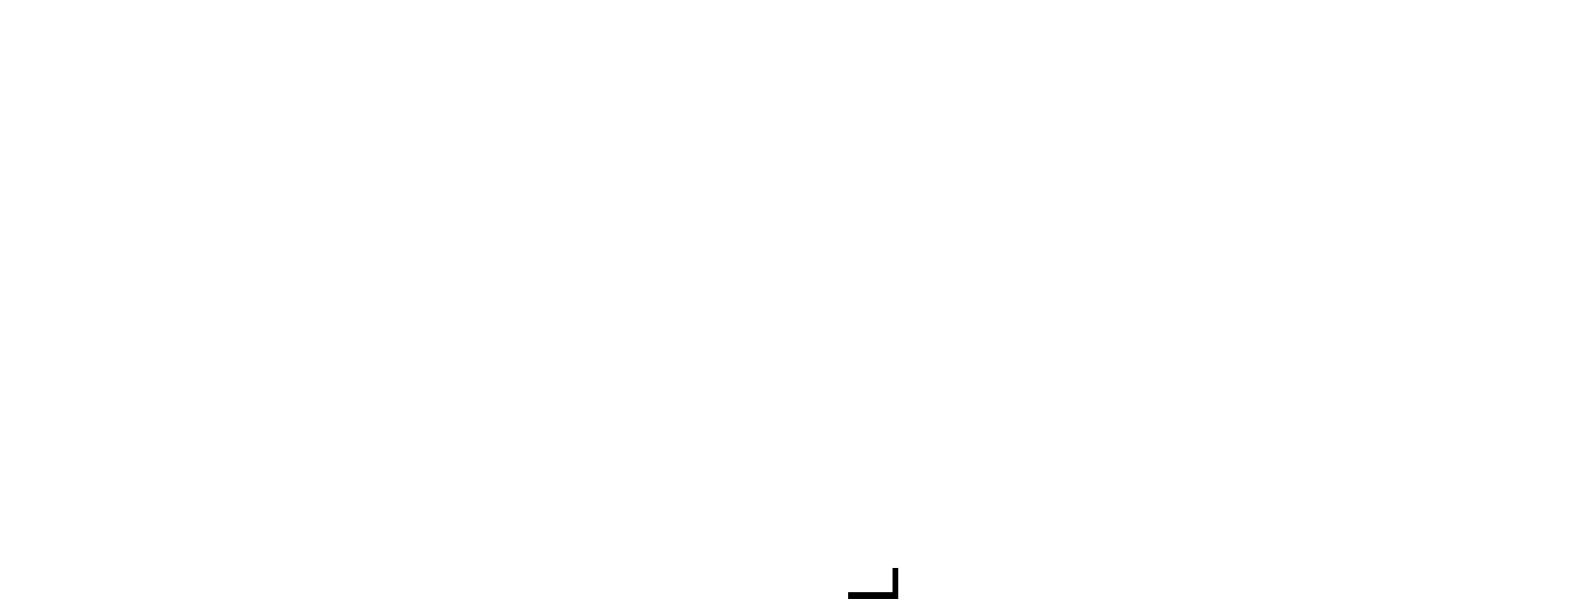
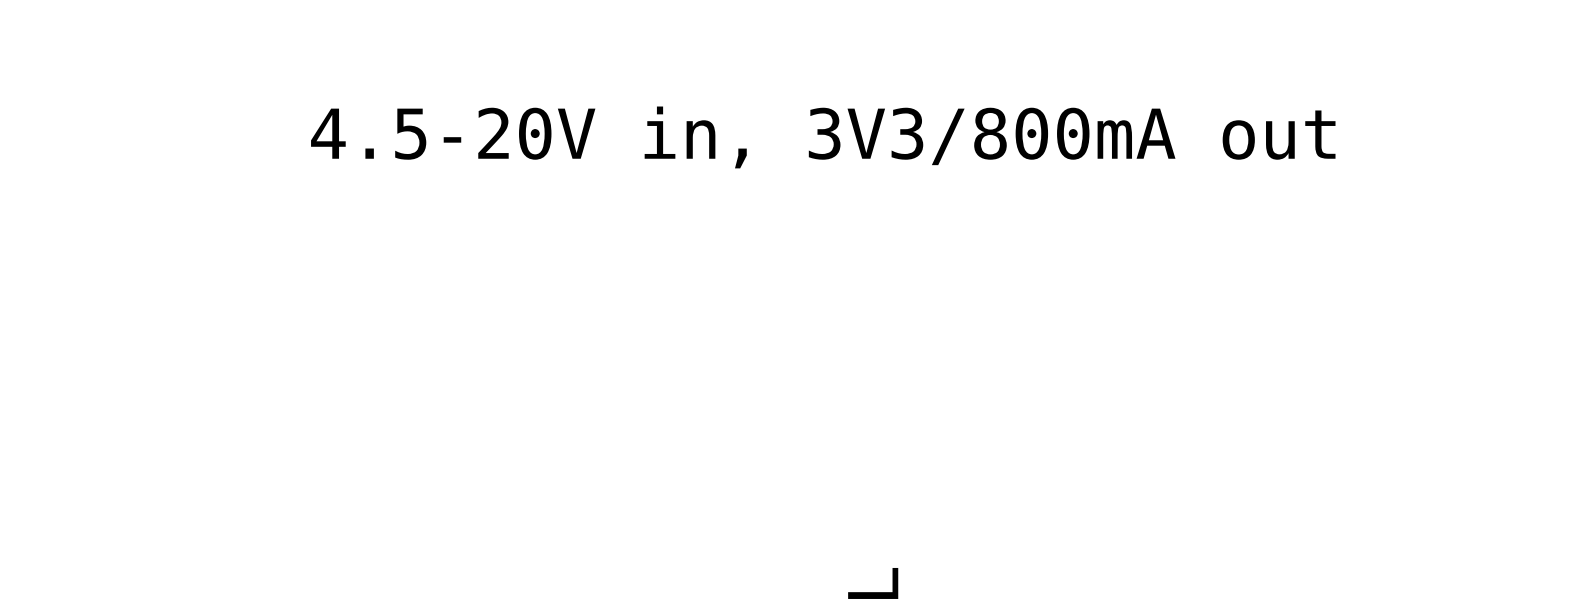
text: none -> 4.5-20V in, 3V3/800mA out (823, 137)

